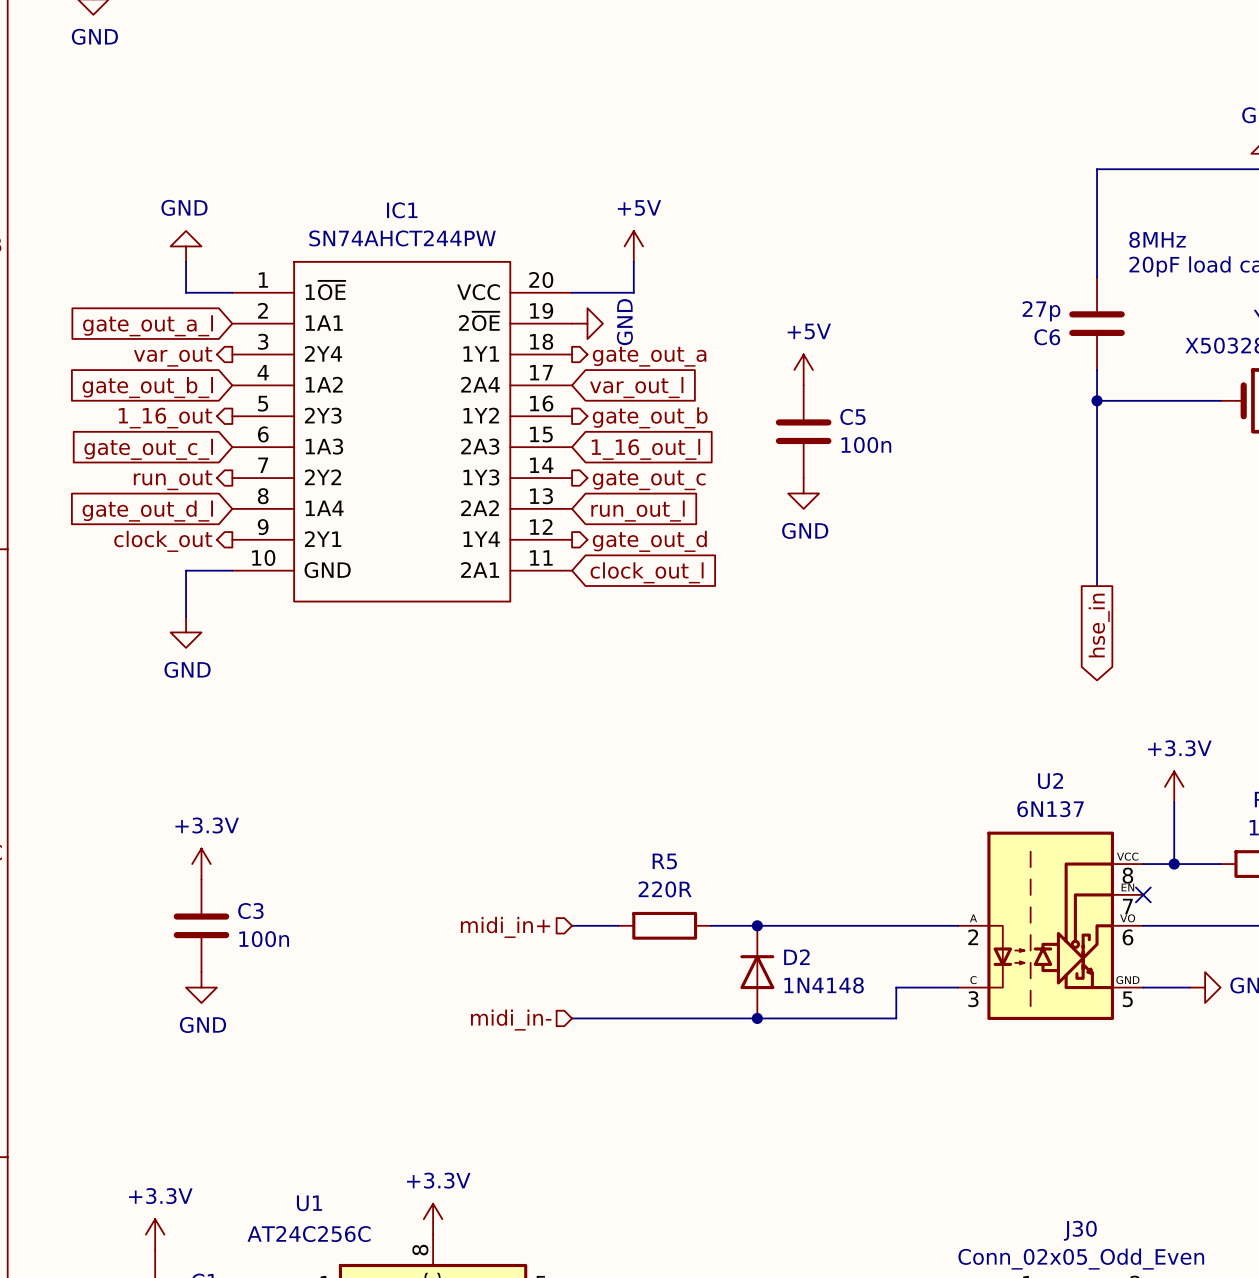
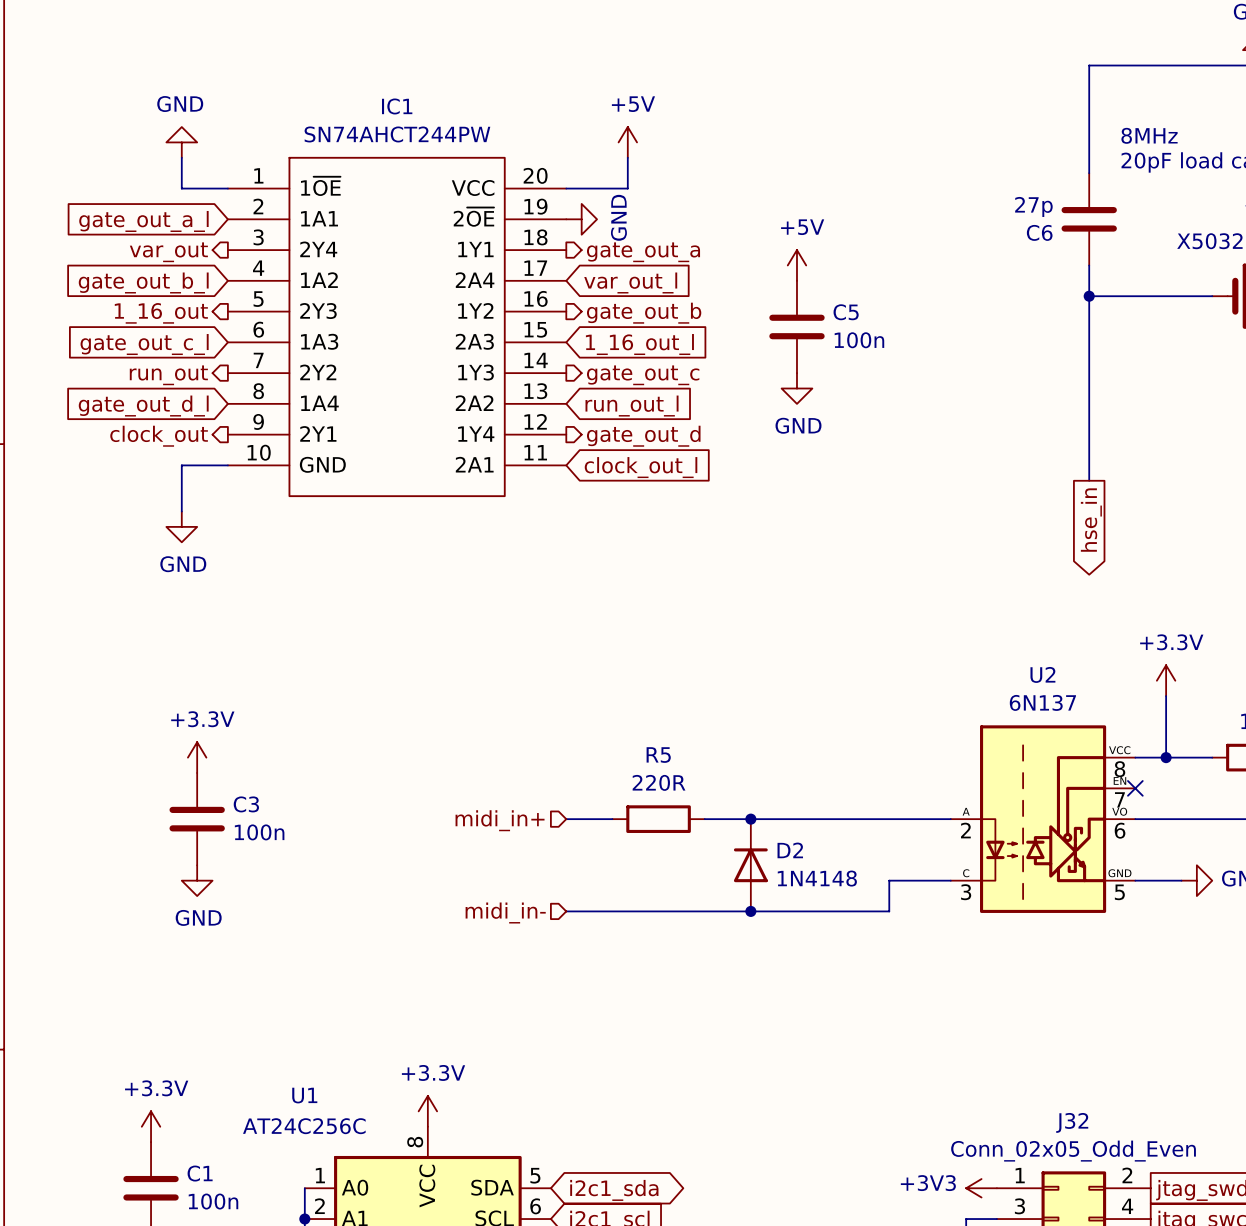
J30 name: J30 (1080, 1230) -> J32 (1072, 1122)

